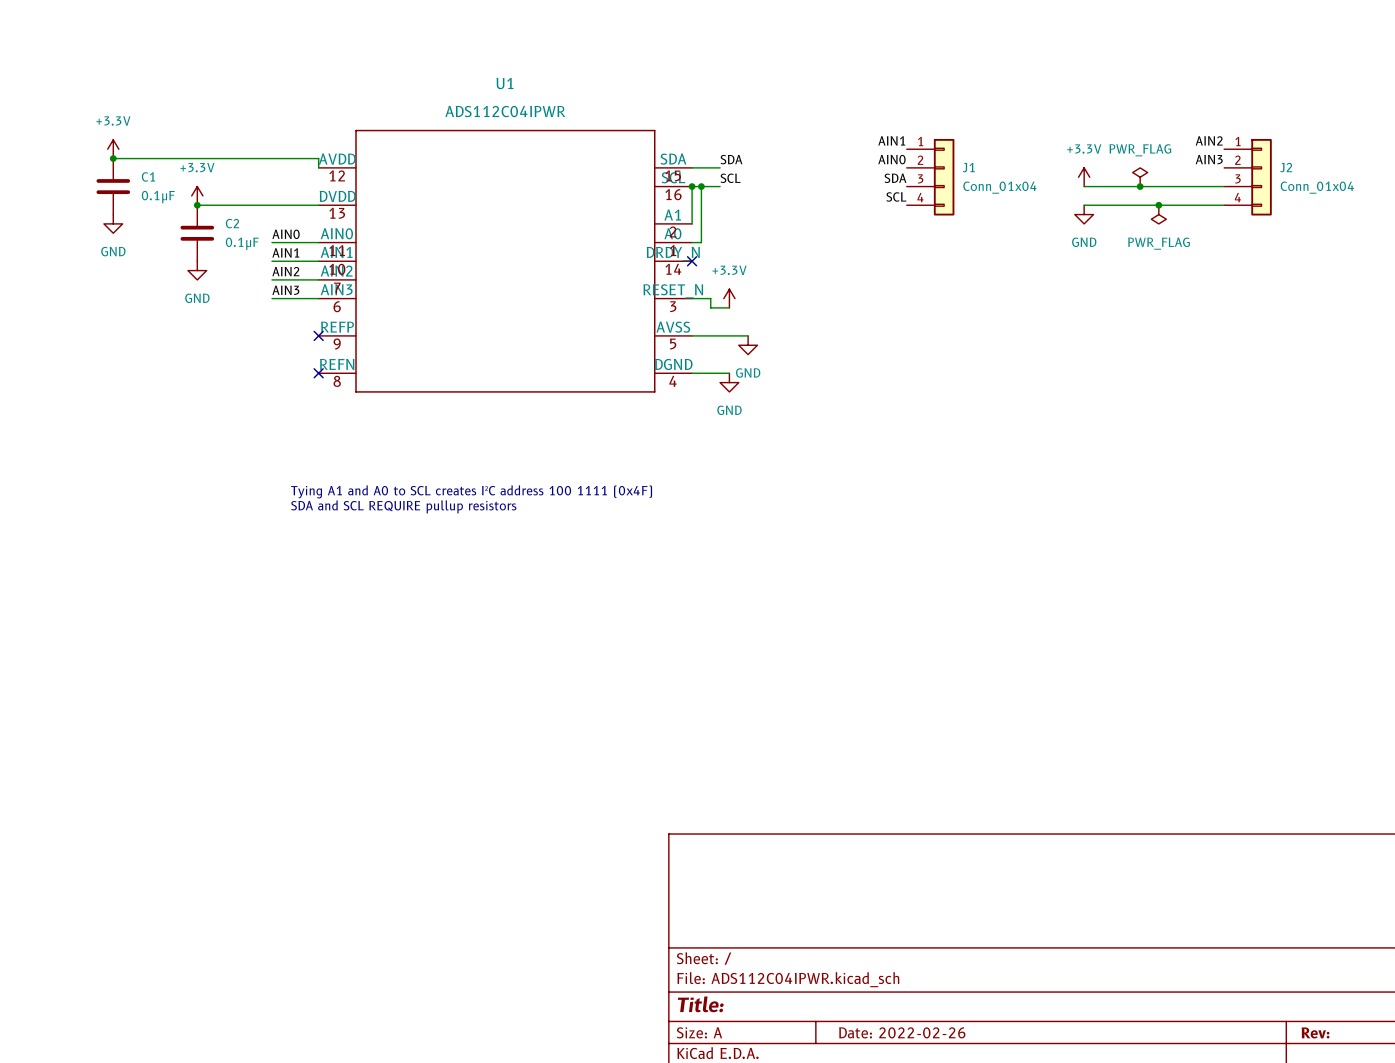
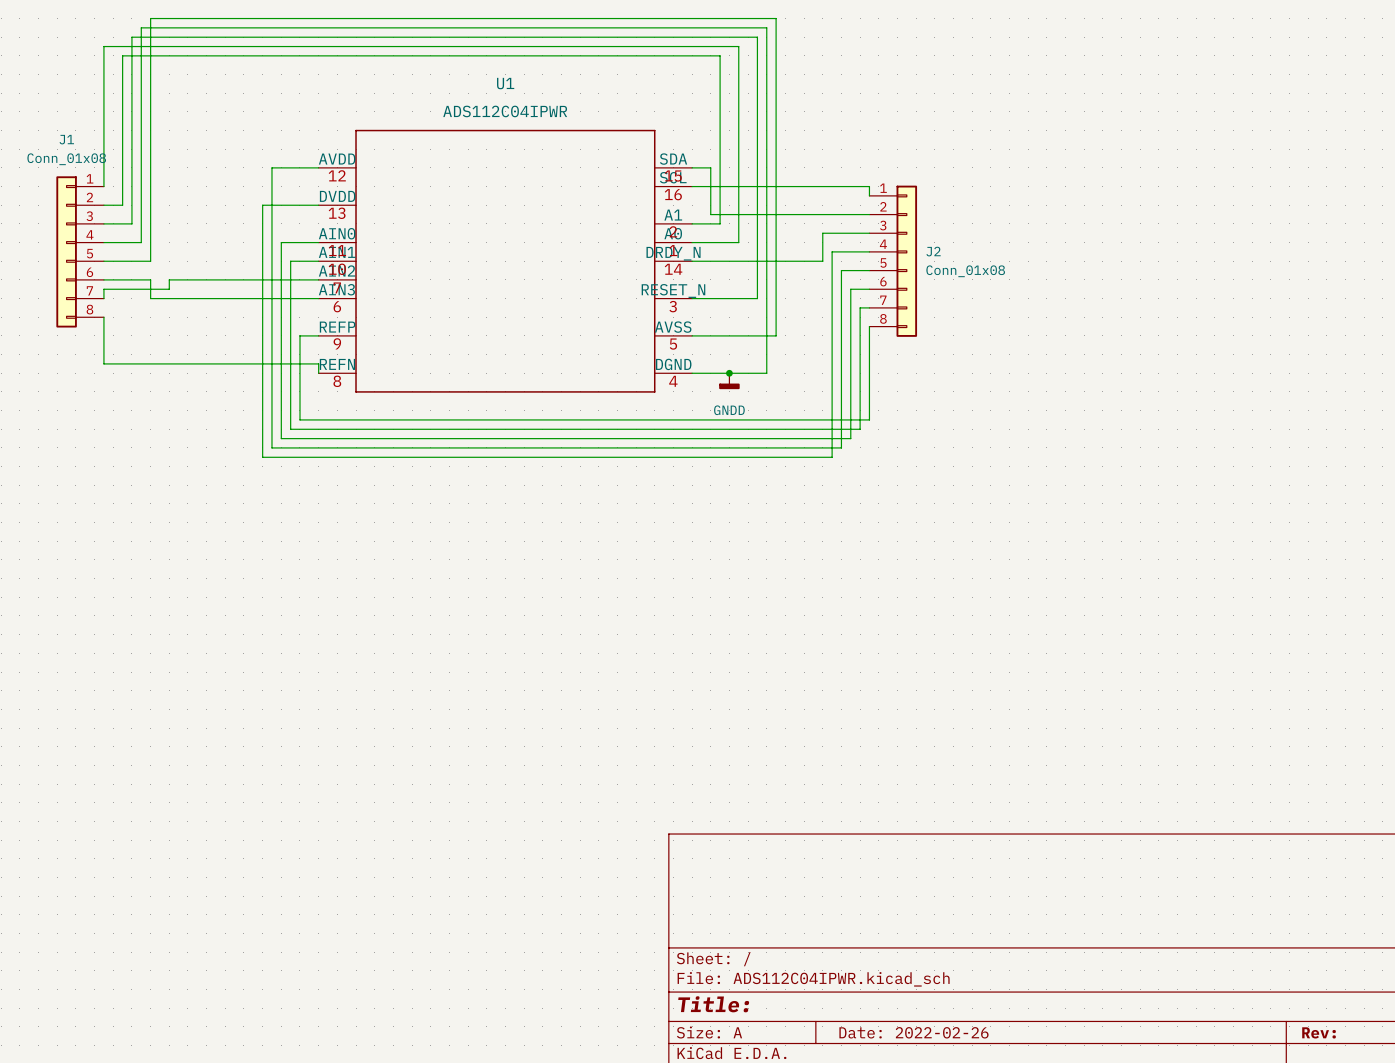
J1 symbol: [906, 138, 955, 216] -> [56, 176, 104, 328]
J2 symbol: [1224, 138, 1272, 216] -> [869, 185, 918, 337]
label: AIN1 (891, 140) -> none
label: AIN2 (1209, 140) -> none
power symbol: +3.3V (113, 149) -> none
wire: (113, 158) (318, 158) (318, 167) -> (869, 270) (841, 270) (841, 447) (271, 447) (271, 167) (318, 167)
junction: (113, 158) -> none
label: SDA (731, 159) -> none
label: AIN0 (891, 159) -> none
label: AIN3 (1209, 159) -> none
wire: (710, 167) (720, 167) -> (710, 167) (710, 214) (869, 214)
J1 name position: J1 (968, 167) -> J1 (66, 139)
power symbol: +3.3V (1084, 177) -> none
power symbol: PWR_FLAG (1140, 177) -> none
label: SCL (730, 178) -> none
label: SDA (895, 178) -> none
C1: 0.1μF (113, 186) -> none
wire: (692, 186) (692, 223) -> (103, 205) (122, 205) (122, 55) (720, 55) (720, 223) (692, 223)
junction: (692, 186) -> none
wire: (701, 186) (701, 242) -> (103, 186) (103, 46) (738, 46) (738, 242) (701, 242)
junction: (701, 186) -> none
wire: none -> (720, 186) (869, 186) (869, 195)
wire: (1084, 186) (1224, 186) -> none
junction: (1140, 186) -> none
J1 value: Conn_01x04 (999, 187) -> Conn_01x08 (66, 159)
J2 value: Conn_01x04 (1317, 187) -> Conn_01x08 (965, 271)
power symbol: +3.3V (197, 195) -> none
label: SCL (896, 196) -> none
wire: (197, 205) (262, 205) -> (869, 251) (832, 251) (832, 457) (262, 457) (262, 205)
junction: (197, 205) -> none
wire: (1084, 205) (1224, 205) -> none
junction: (1158, 205) -> none
power symbol: GND (1084, 214) -> none
power symbol: PWR_FLAG (1158, 214) -> none
power symbol: GND (113, 223) -> none
C2: 0.1μF (197, 233) -> none
wire: none -> (869, 233) (822, 233) (822, 261) (692, 261)
label: AIN0 (286, 234) -> none
wire: none -> (103, 242) (141, 242) (141, 27) (766, 27) (766, 373) (729, 373)
wire: (271, 242) (281, 242) -> (869, 289) (850, 289) (850, 438) (281, 438) (281, 242)
label: AIN1 (285, 252) -> none
wire: none -> (103, 261) (150, 261) (150, 18) (776, 18) (776, 335) (748, 335)
wire: (271, 261) (290, 261) -> (869, 307) (860, 307) (860, 429) (290, 429) (290, 261)
no-connect mark: (692, 261) -> none
power symbol: GND (197, 270) -> none
label: AIN2 (285, 271) -> none
wire: none -> (103, 279) (150, 279) (150, 298) (271, 298)
wire: none -> (271, 279) (169, 279) (169, 289) (103, 289) (103, 298)
label: AIN3 (285, 290) -> none
wire: (710, 298) (710, 307) (729, 307) -> (710, 298) (757, 298) (757, 37) (131, 37) (131, 223) (103, 223)
power symbol: +3.3V (729, 298) -> none
wire: none -> (103, 317) (103, 363) (318, 363) (318, 373)
wire: none -> (869, 326) (869, 419) (299, 419) (299, 335) (318, 335)
no-connect mark: (318, 335) -> none
power symbol: GND (748, 345) -> none
no-connect mark: (318, 373) -> none
junction: none -> (729, 373)
power symbol: GND (729, 382) -> GNDD (729, 381)
text: Tying A1 and A0 to SCL creates I²C address 100 1111 (0x4F) (471, 491) -> none
text: SDA and SCL REQUIRE pullup resistors (403, 506) -> none

